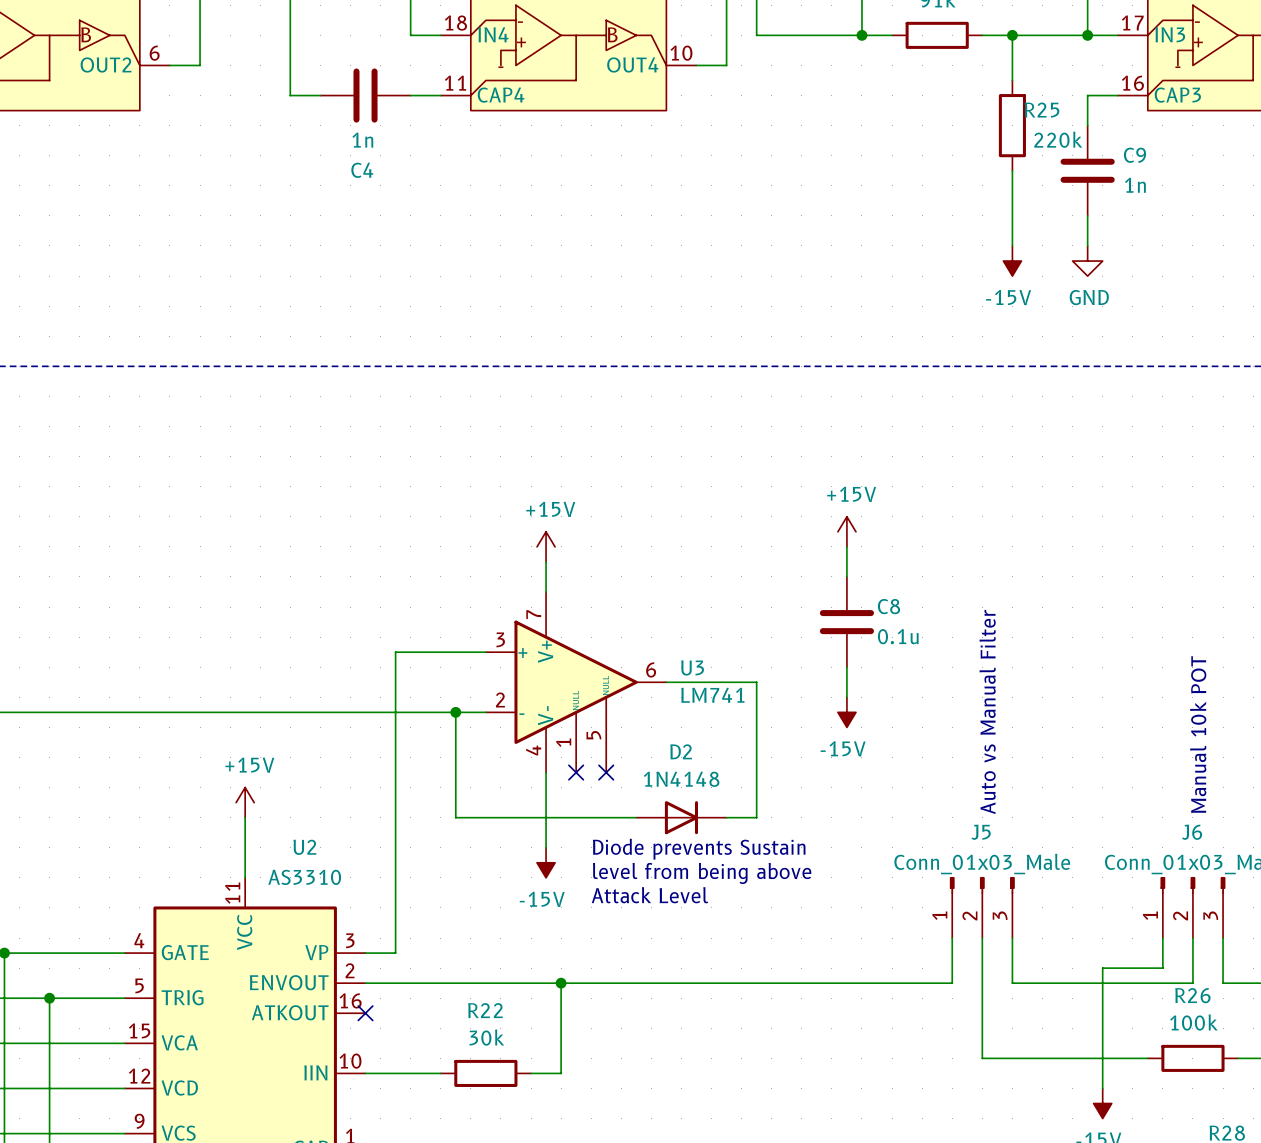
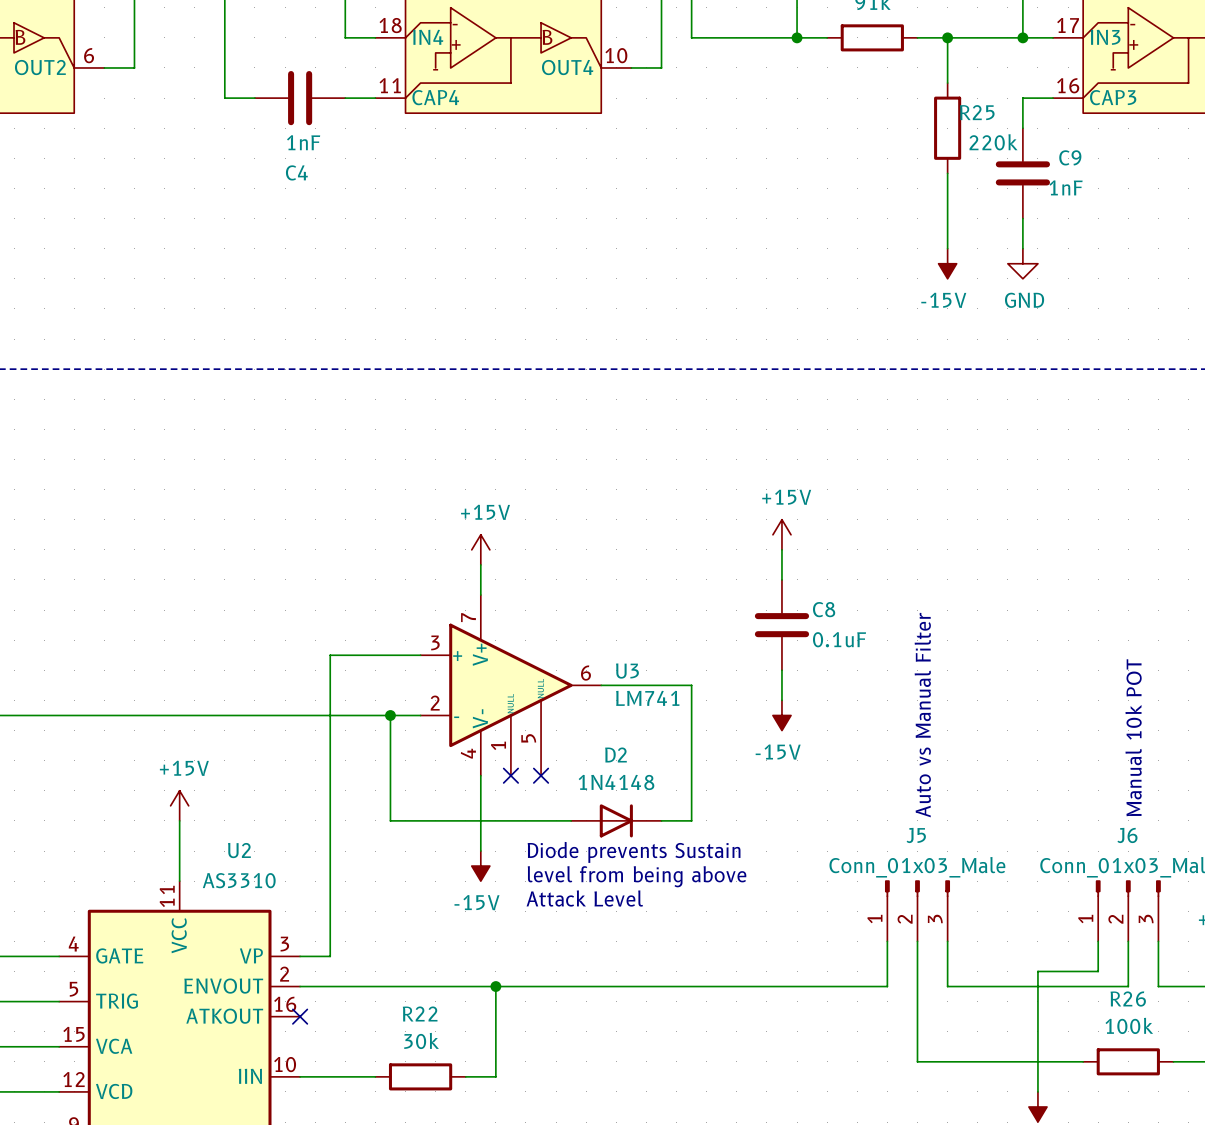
C4 value: 1n (362, 140) -> 1nF (303, 142)
C9 value: 1n (1135, 185) -> 1nF (1066, 187)
C8 value: 0.1u (898, 636) -> 0.1uF (839, 639)

